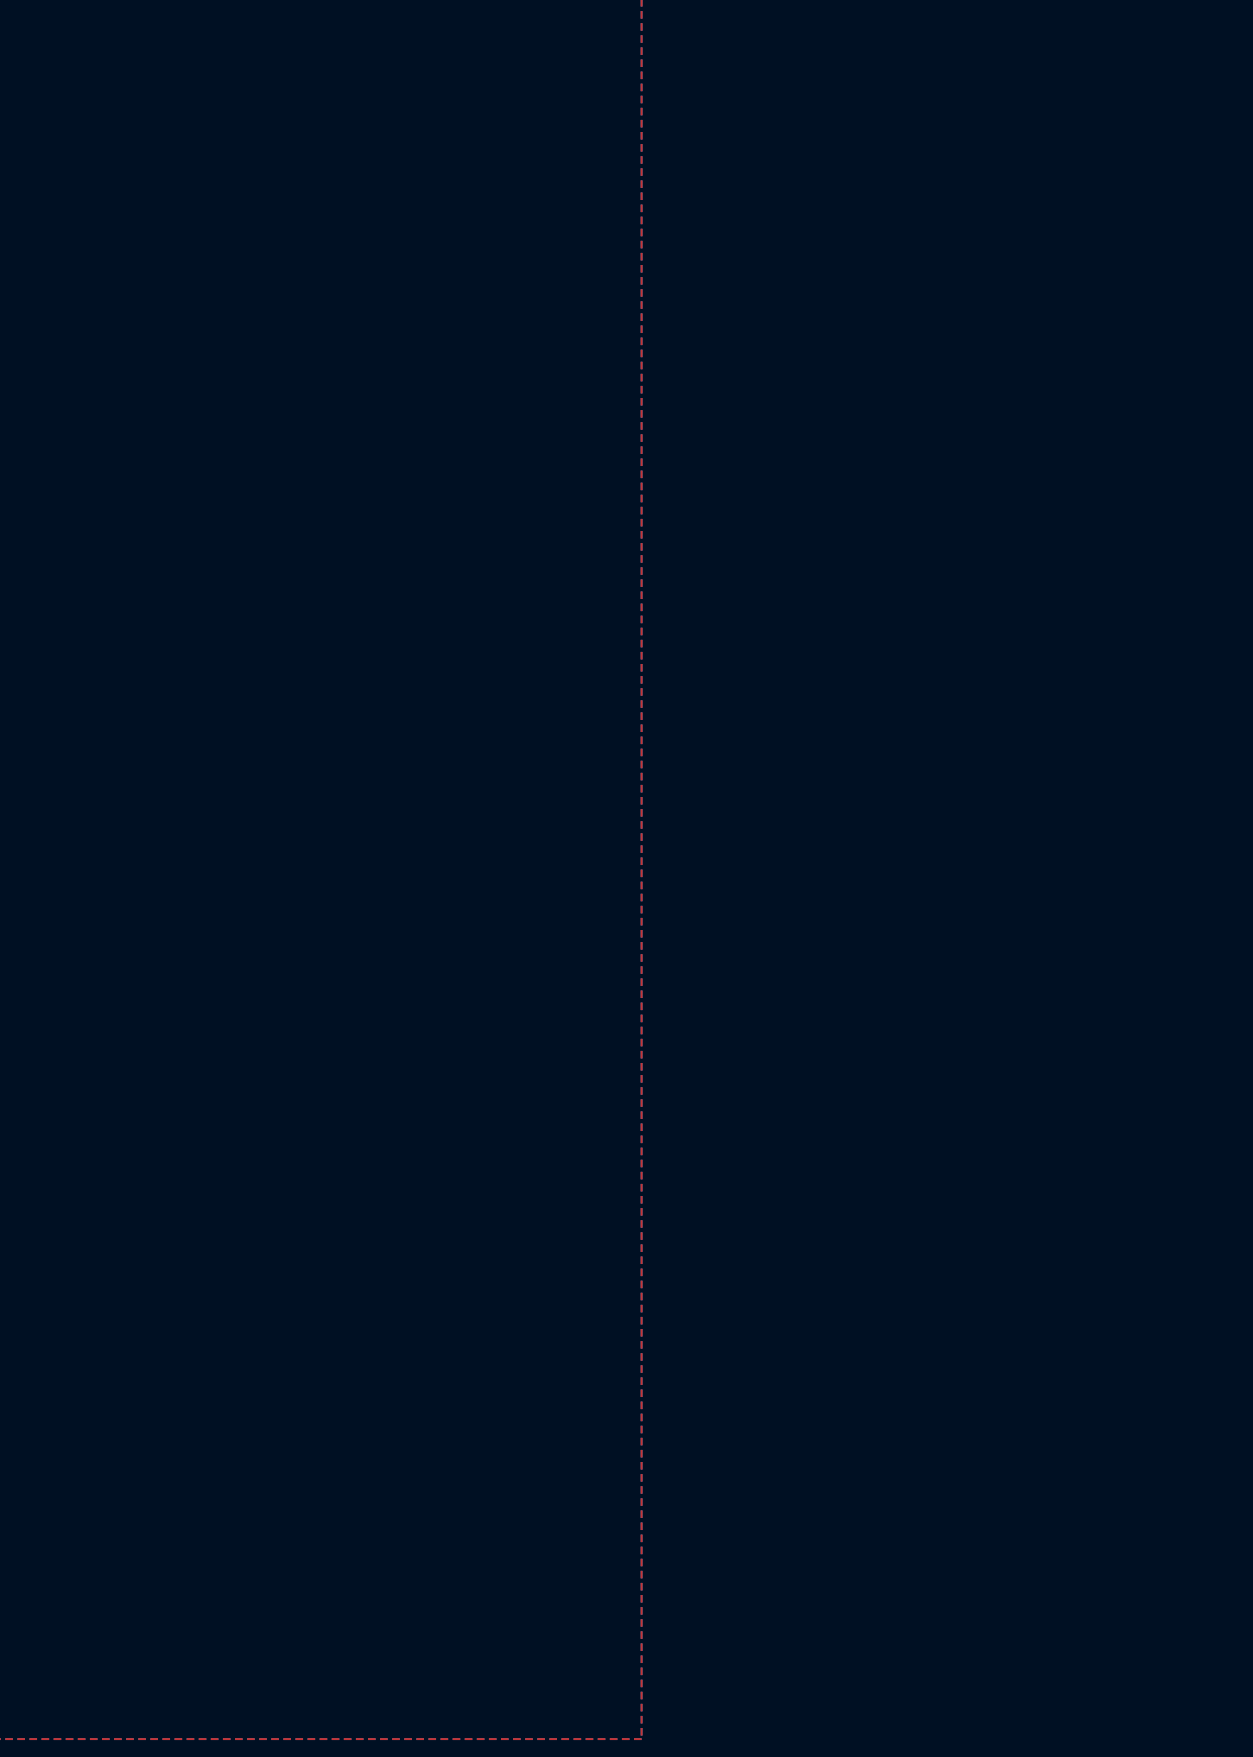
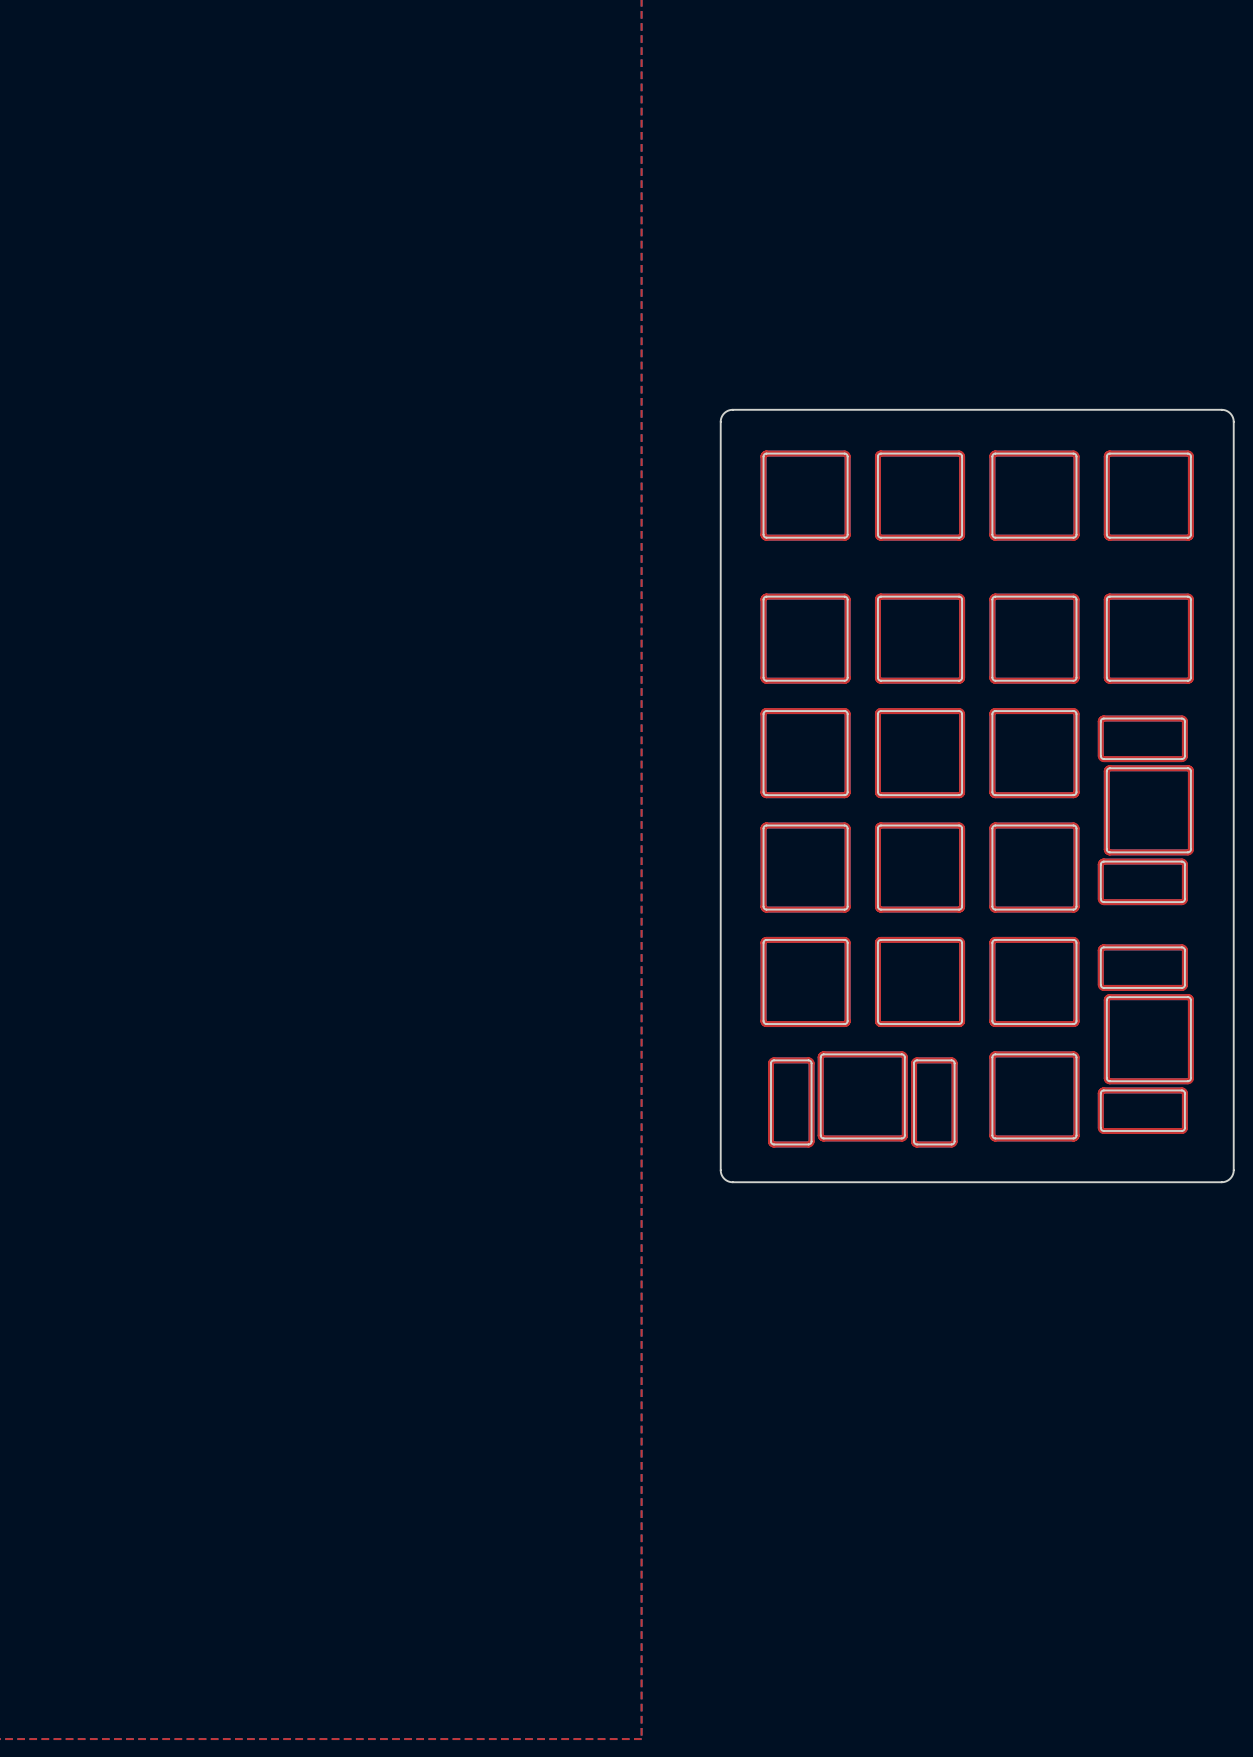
board edge: none -> (732, 409) (1221, 409) (1231, 415) (1233, 421) (1233, 1170) (1228, 1180) (1221, 1182) (732, 1182) (722, 1176) (720, 1170) (720, 421) (724, 413) (732, 409)
drawing: none -> [760, 450, 851, 541]
drawing: none -> [874, 450, 966, 541]
drawing: none -> [989, 450, 1080, 541]
drawing: none -> [1103, 450, 1194, 541]
drawing: none -> [760, 593, 851, 684]
drawing: none -> [874, 593, 966, 684]
drawing: none -> [989, 593, 1080, 684]
drawing: none -> [1103, 593, 1194, 684]
drawing: none -> [760, 708, 851, 799]
drawing: none -> [874, 708, 966, 799]
drawing: none -> [989, 708, 1080, 799]
drawing: none -> [1097, 715, 1194, 906]
drawing: none -> [760, 822, 851, 913]
drawing: none -> [874, 822, 966, 913]
drawing: none -> [989, 822, 1080, 913]
drawing: none -> [760, 936, 851, 1028]
drawing: none -> [874, 936, 966, 1028]
drawing: none -> [989, 936, 1080, 1028]
drawing: none -> [1097, 944, 1194, 1134]
drawing: none -> [767, 1051, 958, 1148]
drawing: none -> [989, 1051, 1080, 1142]

